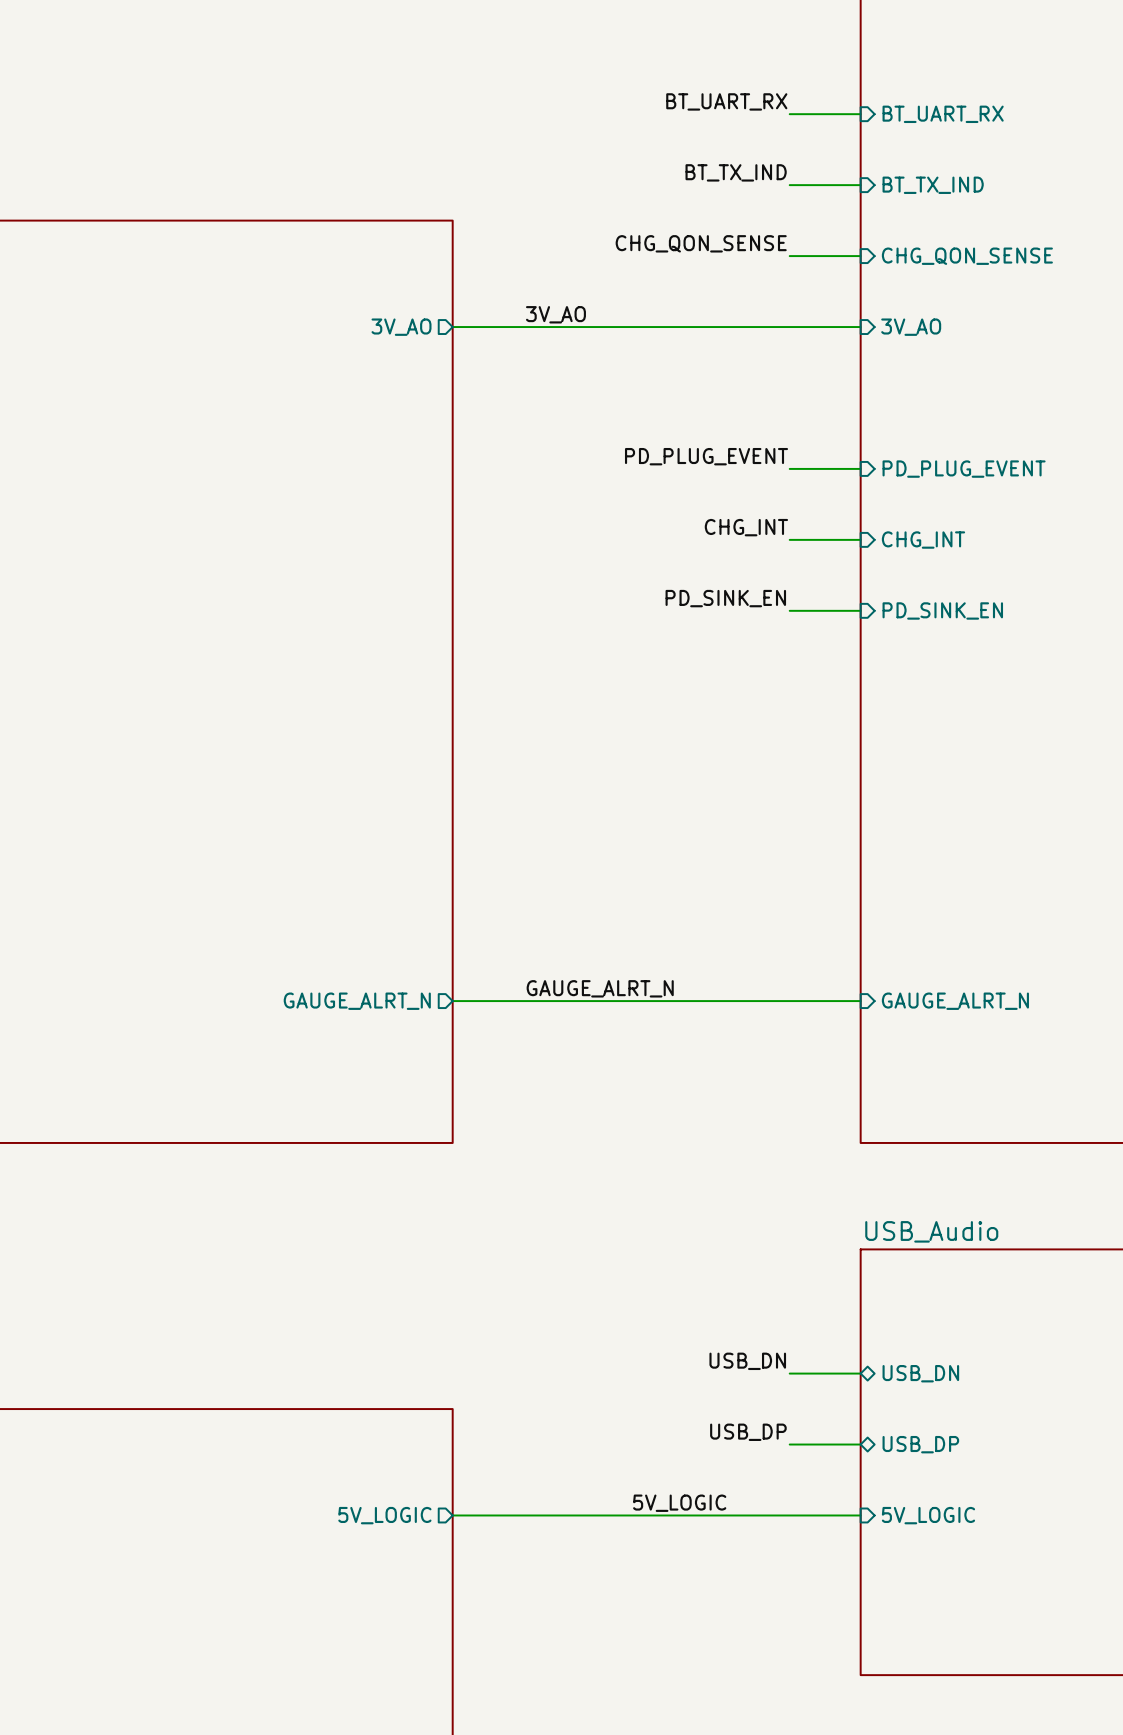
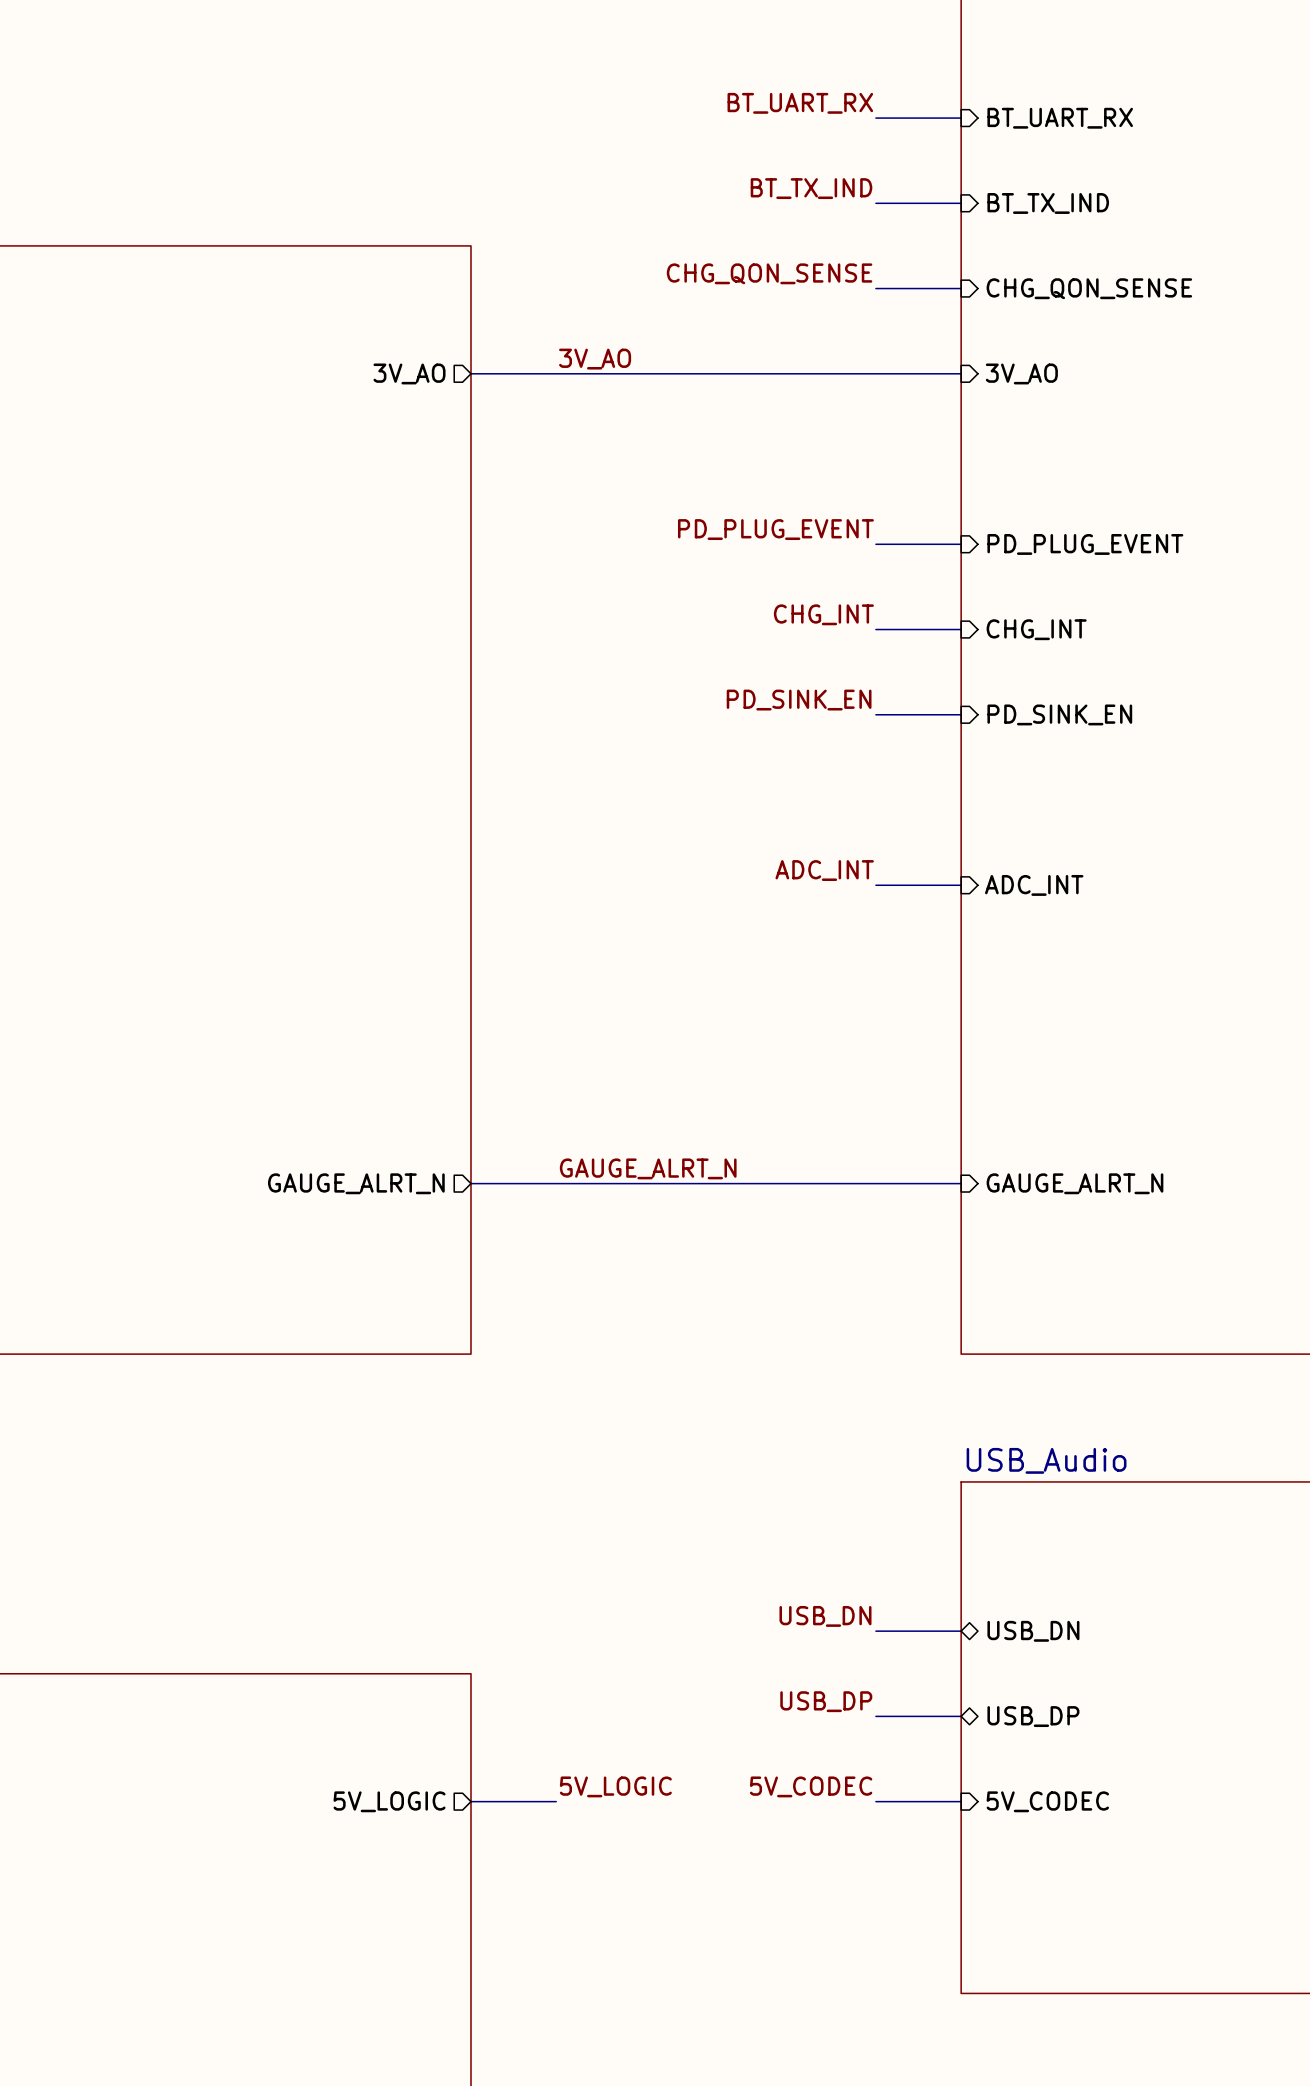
label: none -> ADC_INT (824, 870)
wire: none -> (875, 885) (961, 885)
sheet pin: none -> ADC_INT (1034, 885)
label position: 5V_LOGIC (679, 1503) -> 5V_LOGIC (615, 1786)
label: none -> 5V_CODEC (811, 1786)
wire: (523, 1515) (789, 1515) -> none
sheet pin: 5V_LOGIC (928, 1515) -> 5V_CODEC (1047, 1801)

